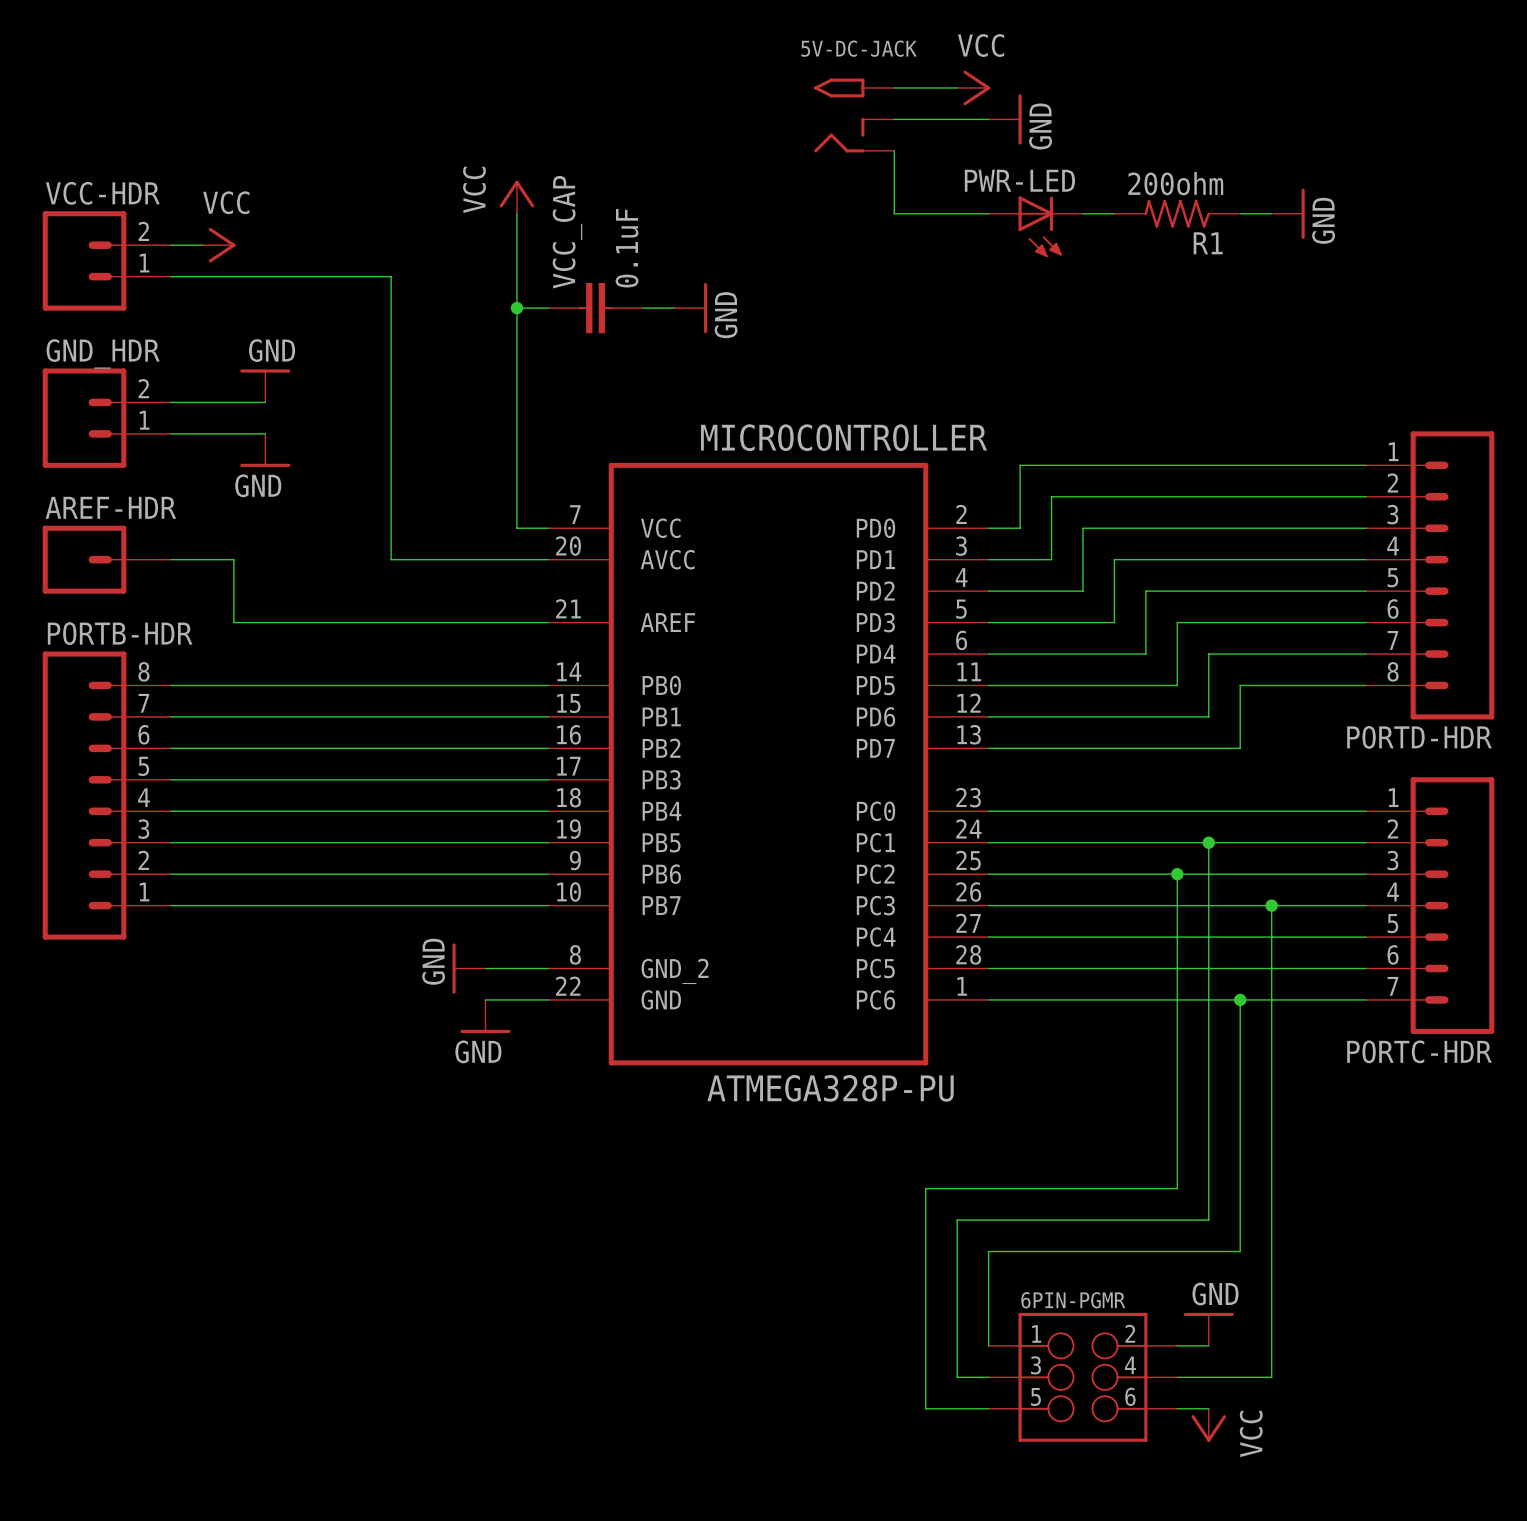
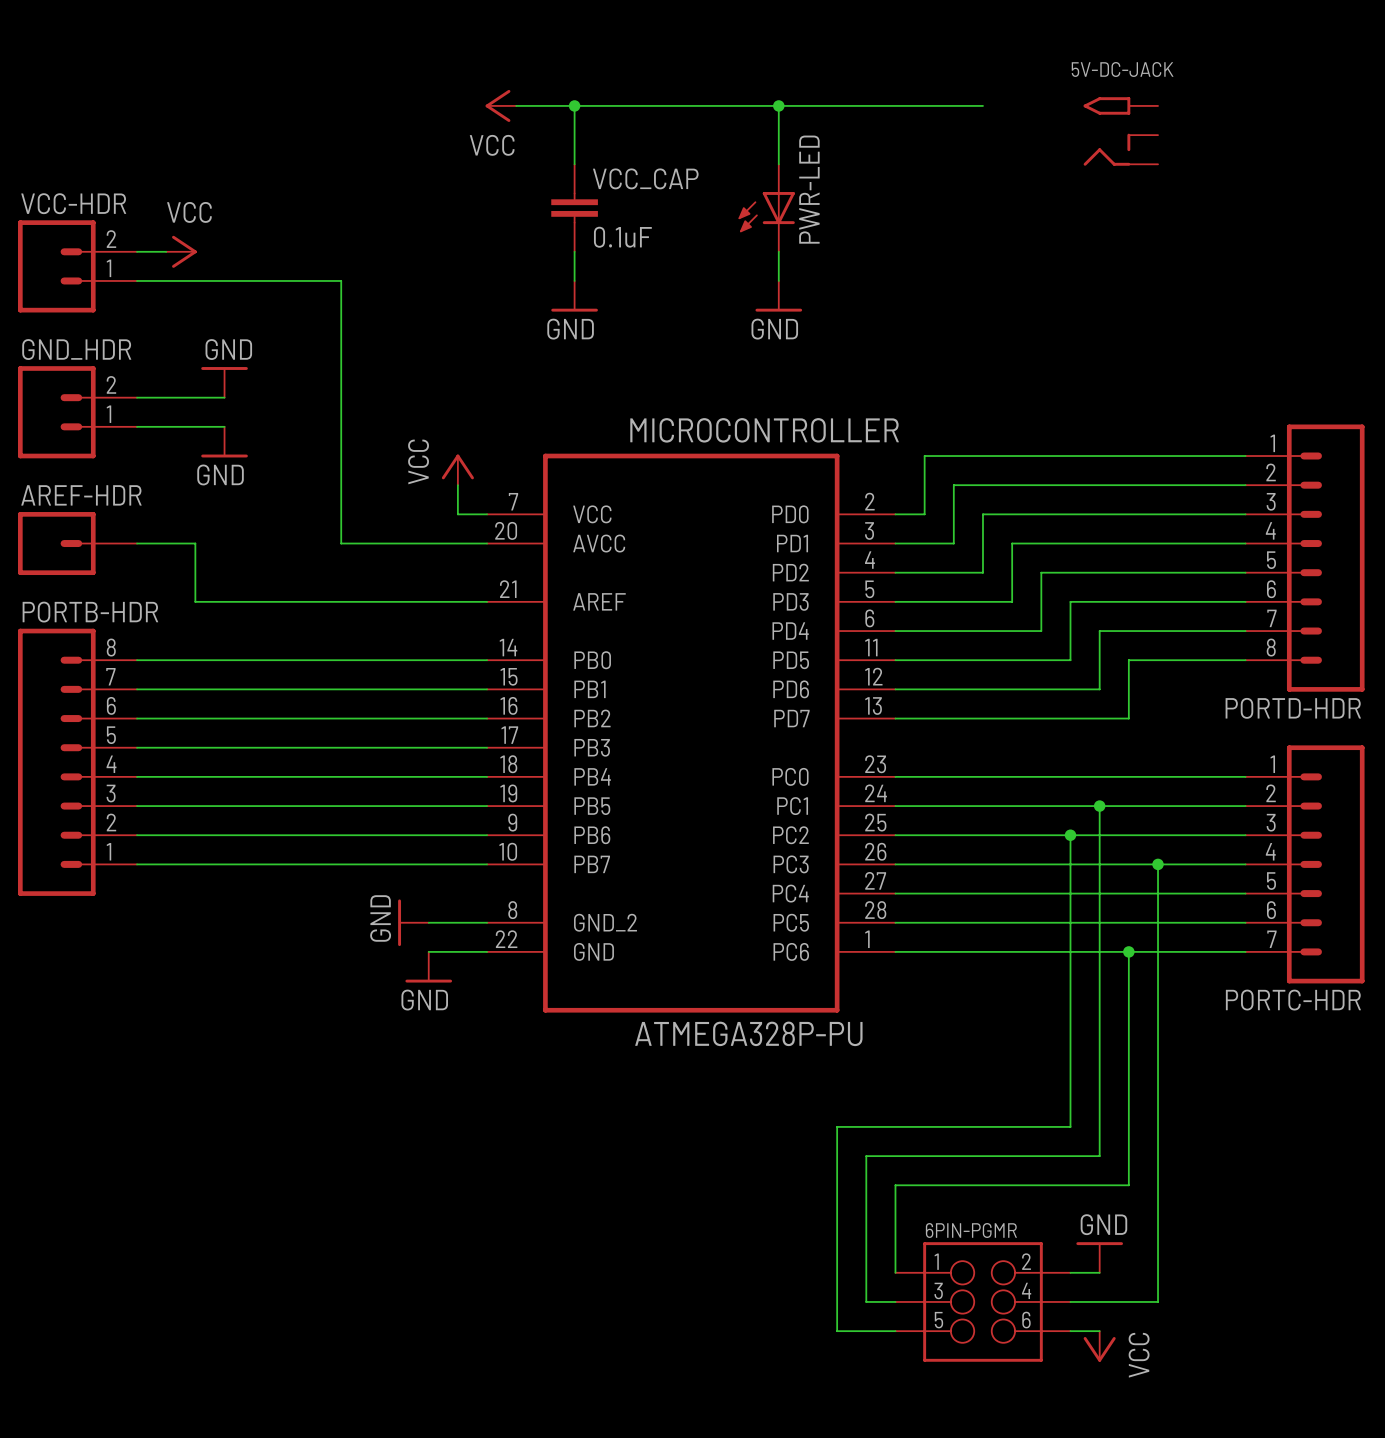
wire: none -> (516, 105) (807, 105)
wire: none -> (574, 105) (574, 164)
junction: none -> (574, 105)
wire: none -> (778, 105) (778, 164)
junction: none -> (778, 105)
wire: none -> (866, 105) (982, 105)
power symbol: VCC (973, 87) -> none
5V-DC-JACK position: (854, 115) -> (1120, 131)
wire: (894, 119) (988, 119) -> none
power symbol: GND (1005, 119) -> none
wire: (894, 150) (894, 213) (988, 213) -> none
power symbol rotation: 0° (516, 194) -> 90° counterclockwise (498, 105)
power symbol position: VCC (516, 197) -> VCC (500, 105)
wire: (516, 213) (516, 496) -> none
wire: (1082, 213) (1114, 213) -> none
R1: 200ohm (1177, 213) -> none
wire: (1240, 213) (1271, 213) -> none
power symbol: GND (1288, 213) -> none
PWR-LED position: (1035, 226) -> (766, 208)
PWR-LED rotation: 0° (1040, 226) -> 90° clockwise (766, 212)
wire: none -> (574, 251) (574, 280)
wire: none -> (778, 251) (778, 280)
power symbol: none -> GND (778, 296)
wire: (516, 308) (548, 308) -> none
junction: (516, 308) -> none
VCC_CAP rotation: 0° (595, 308) -> 90° clockwise (574, 208)
VCC_CAP position: (595, 308) -> (574, 208)
power symbol position: GND (690, 308) -> GND (574, 296)
power symbol rotation: 0° (705, 308) -> 90° clockwise (574, 310)
power symbol: none -> VCC (457, 469)

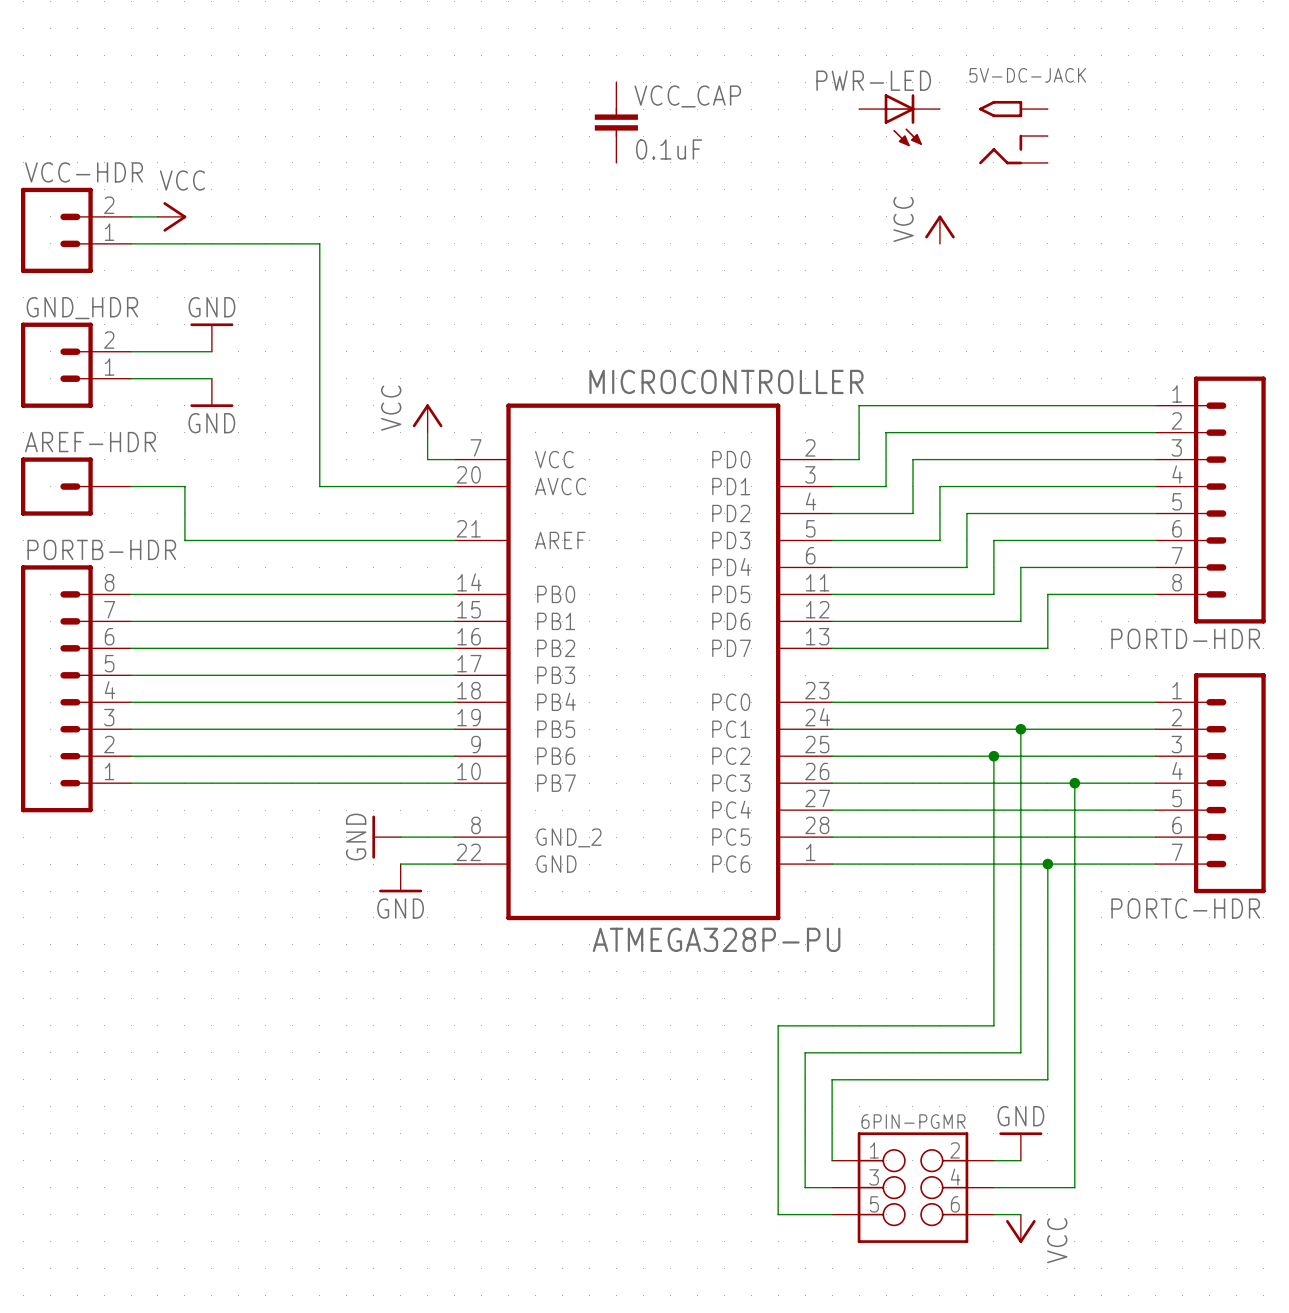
power symbol: VCC (500, 105) -> none
wire: (516, 105) (982, 105) -> none
wire: (574, 105) (574, 164) -> none
junction: (574, 105) -> none
wire: (778, 105) (778, 164) -> none
junction: (778, 105) -> none
5V-DC-JACK position: (1120, 131) -> (1013, 132)
VCC_CAP position: (574, 208) -> (616, 122)
PWR-LED position: (766, 208) -> (899, 120)
PWR-LED rotation: 0° (766, 212) -> 90° counterclockwise (903, 120)
wire: (574, 251) (574, 280) -> none
wire: (778, 251) (778, 280) -> none
power symbol: none -> VCC (939, 229)
power symbol: GND (574, 296) -> none
power symbol: GND (778, 296) -> none

